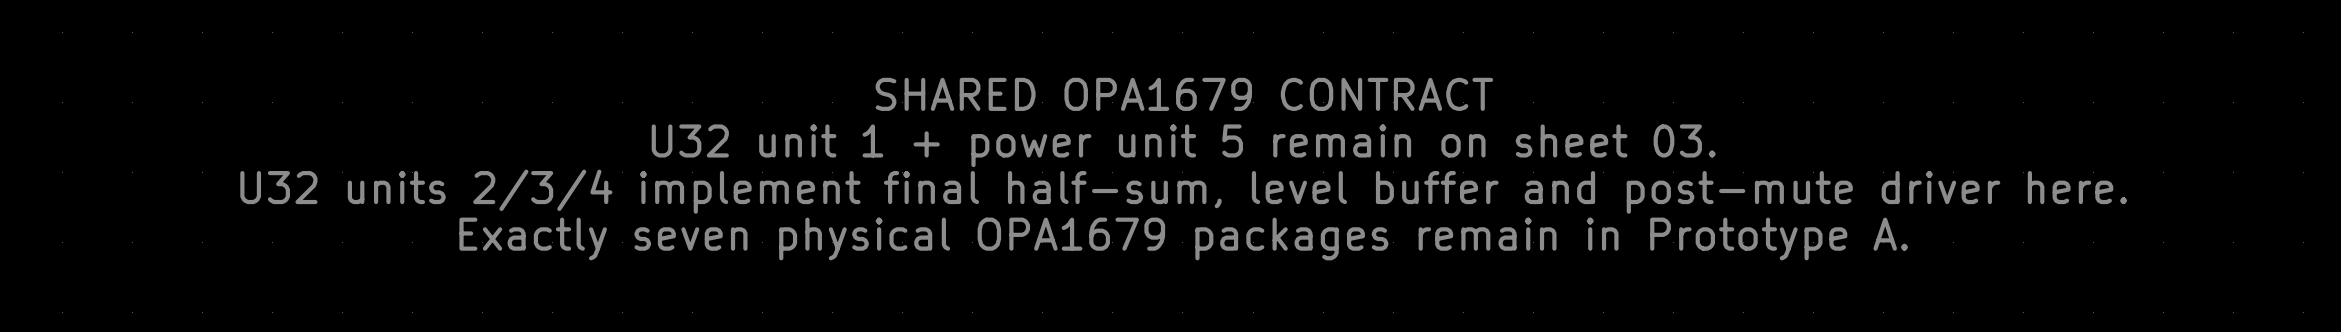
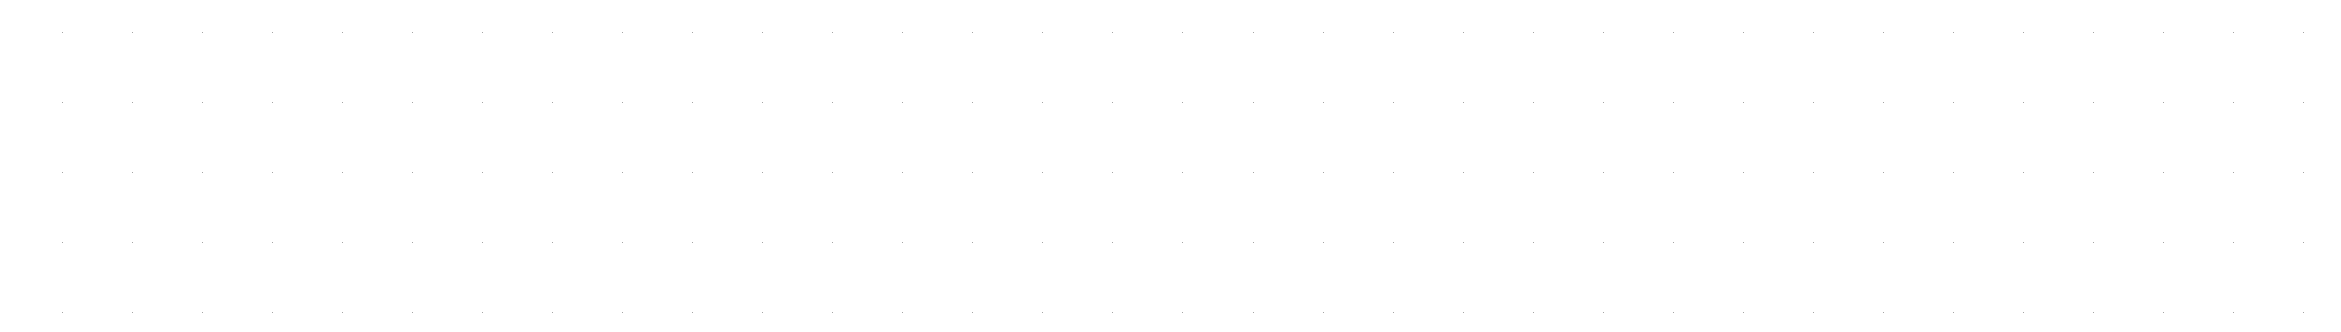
text: SHARED OPA1679 CONTRACT (1184, 94) -> none
text: U32 unit 1 + power unit 5 remain on sheet 03. (1183, 145) -> none
text: U32 units 2/3/4 implement final half-sum, level buffer and post-mute driver here. (1183, 191) -> none
text: Exactly seven physical OPA1679 packages remain in Prototype A. (1183, 238) -> none

